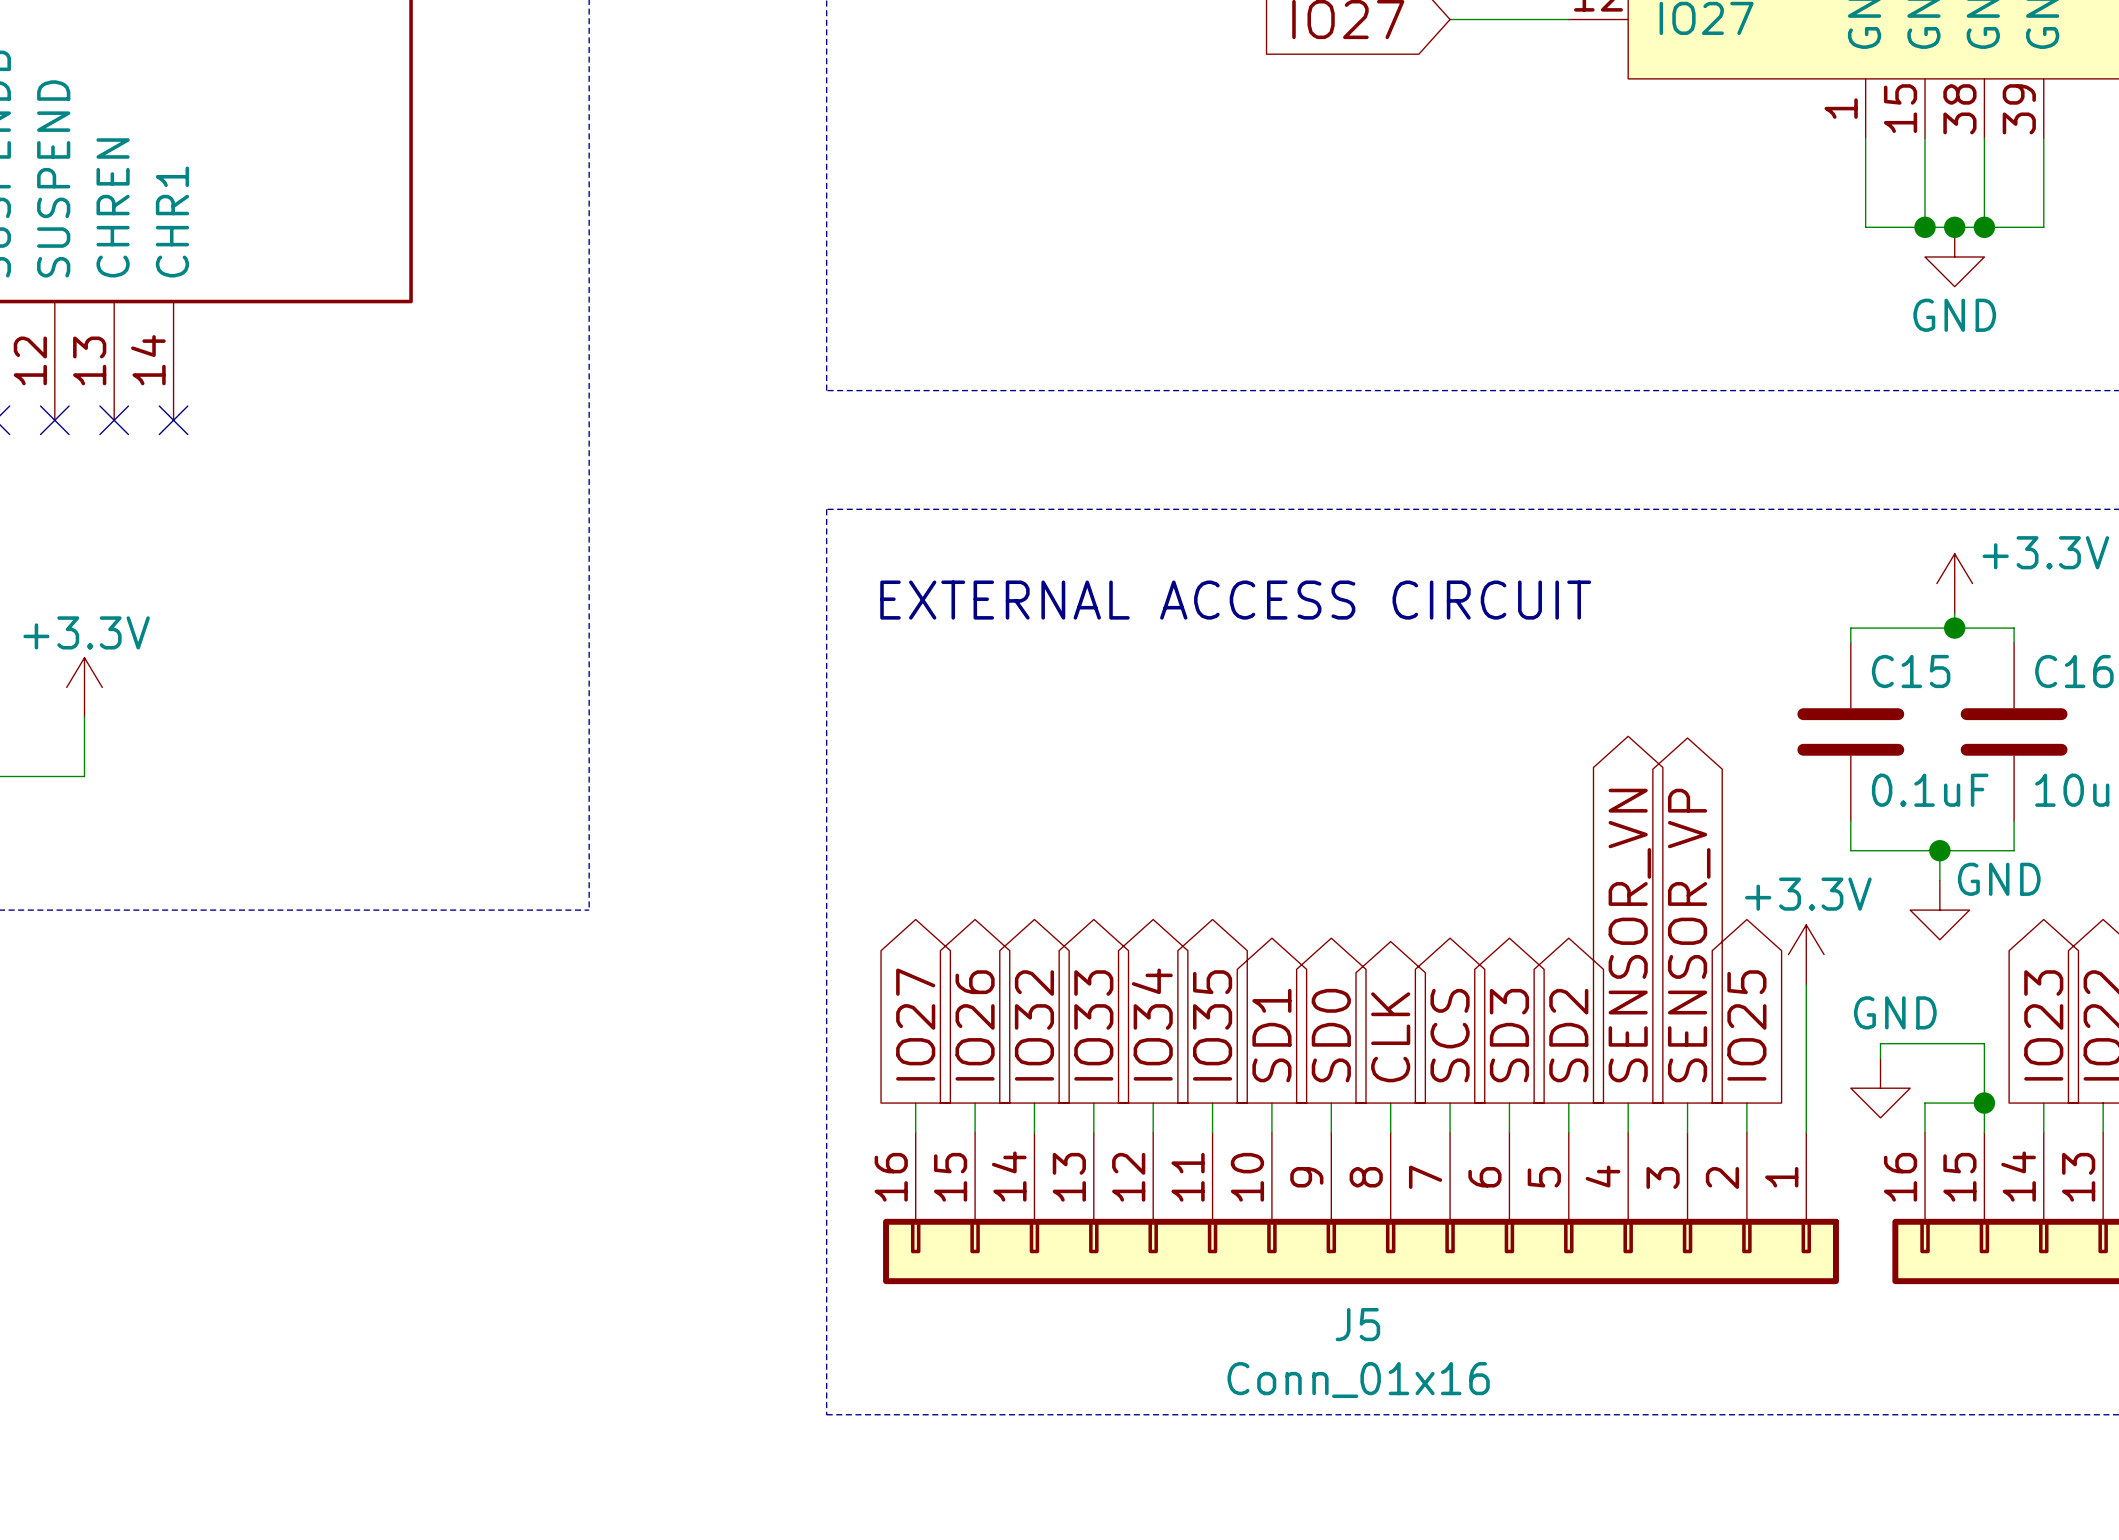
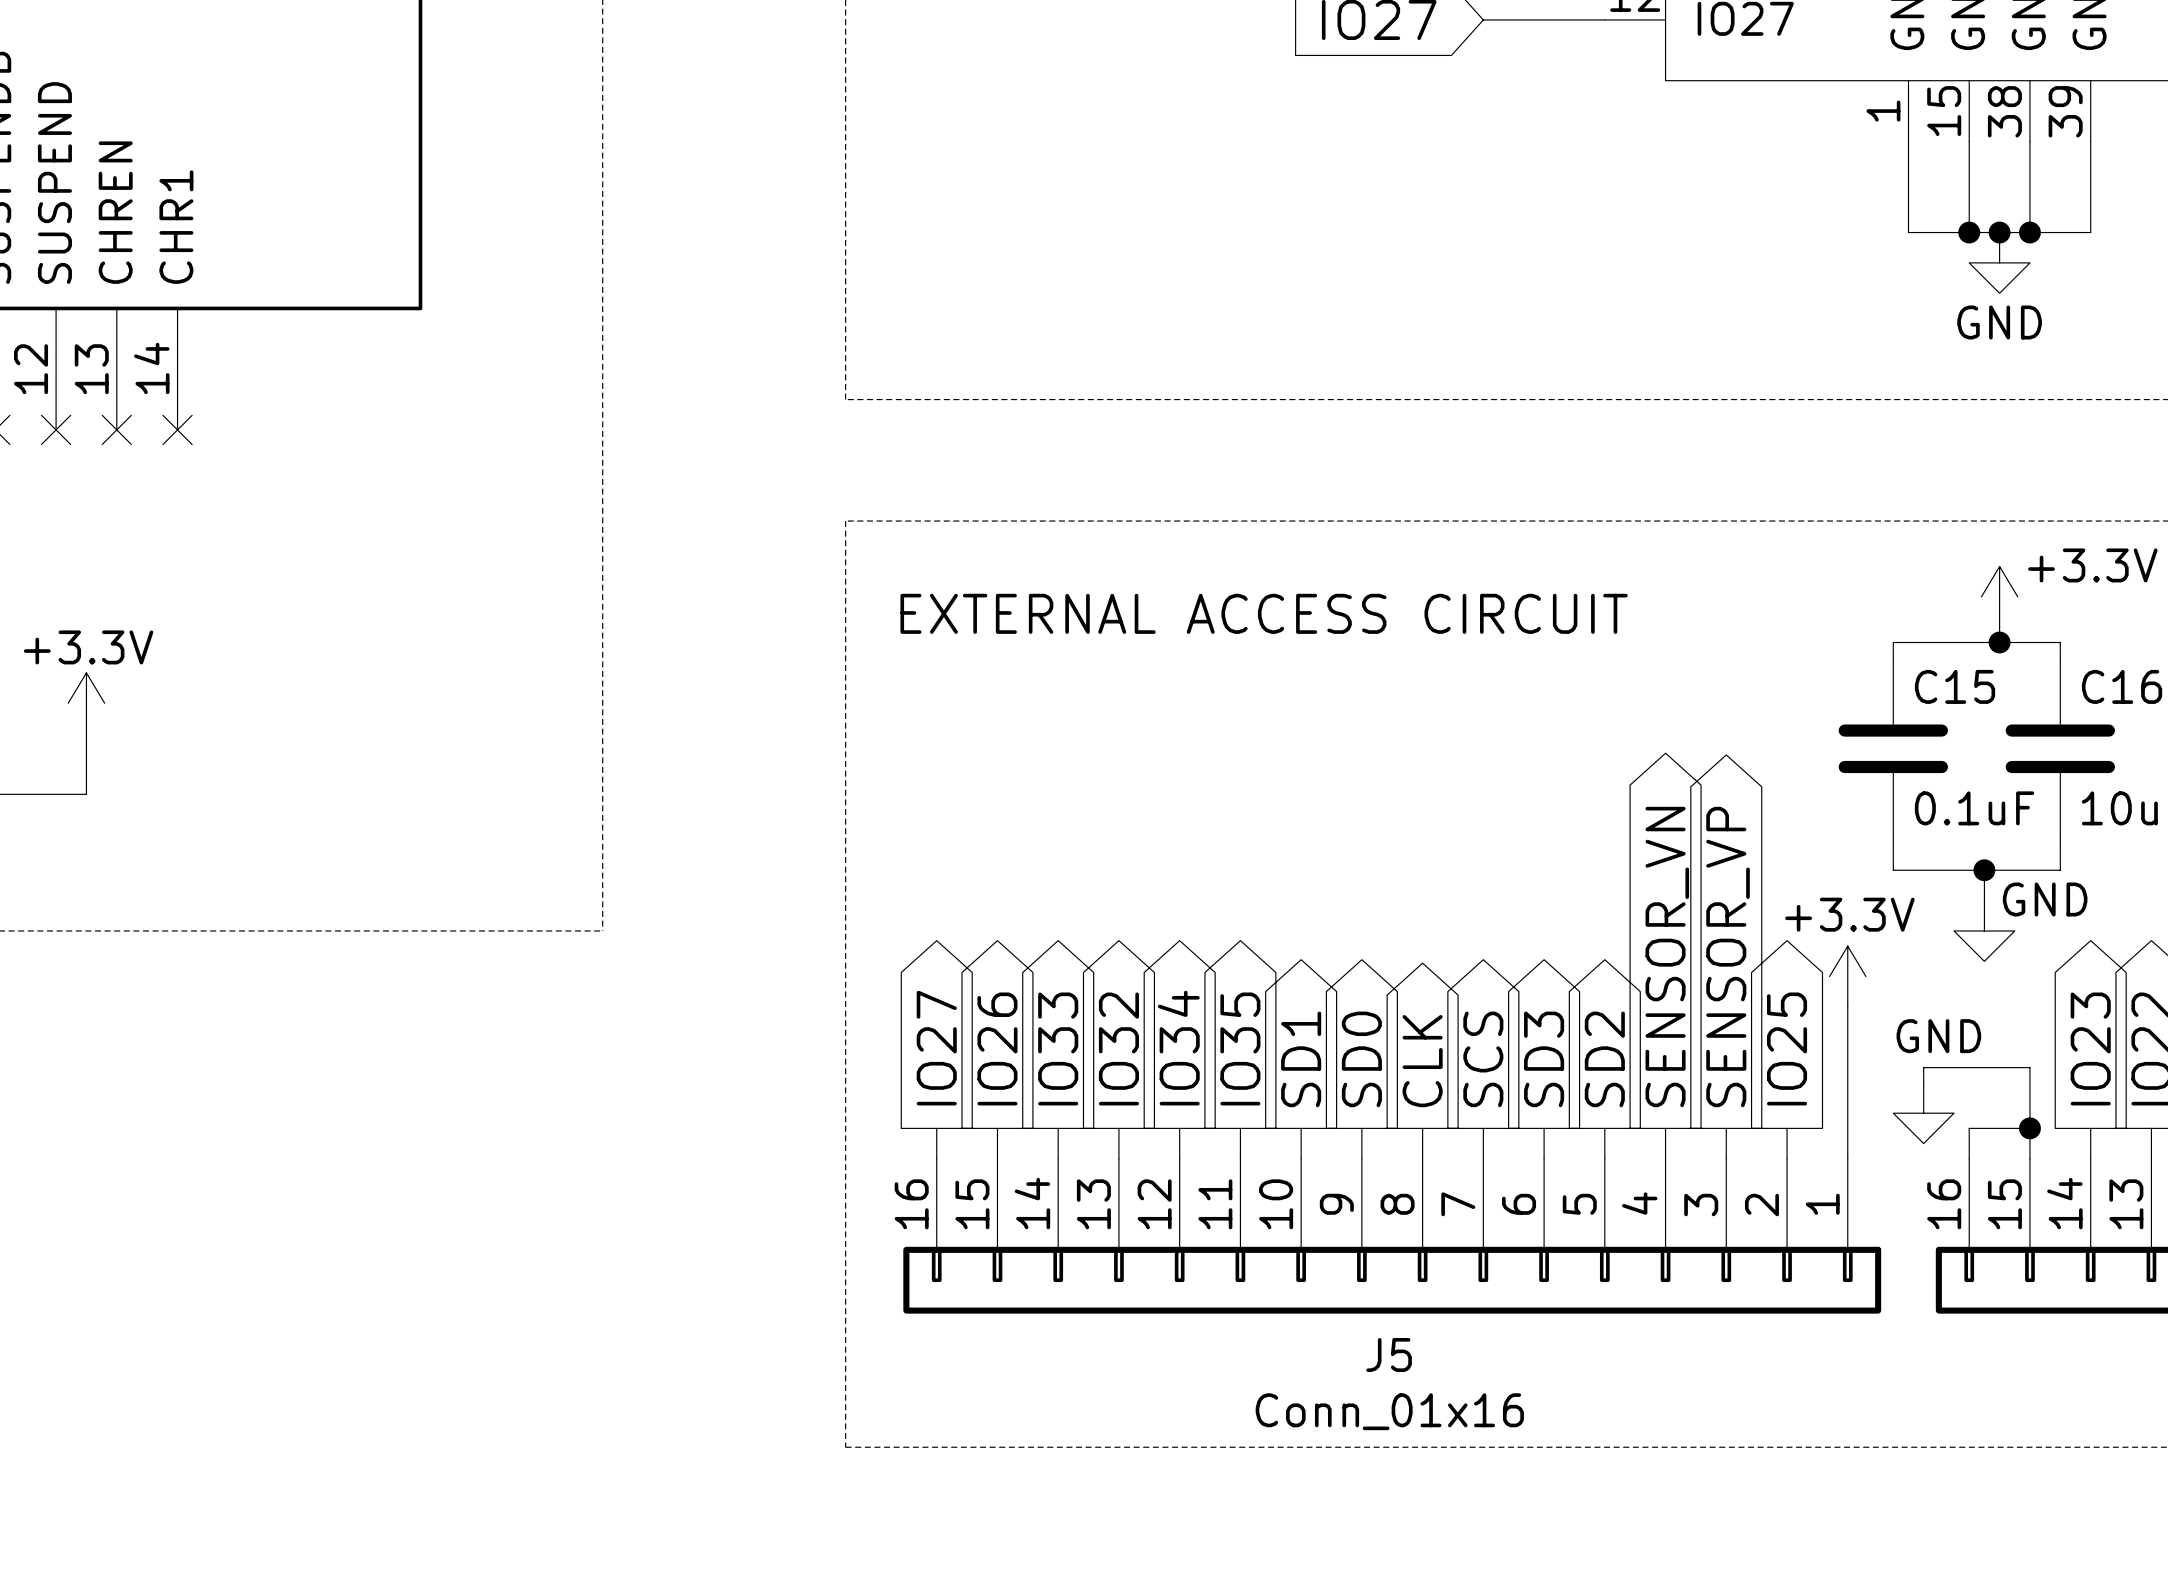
global label: IO32 (1034, 1025) -> IO33 (1058, 1048)
global label: IO33 (1093, 1025) -> IO32 (1118, 1048)

